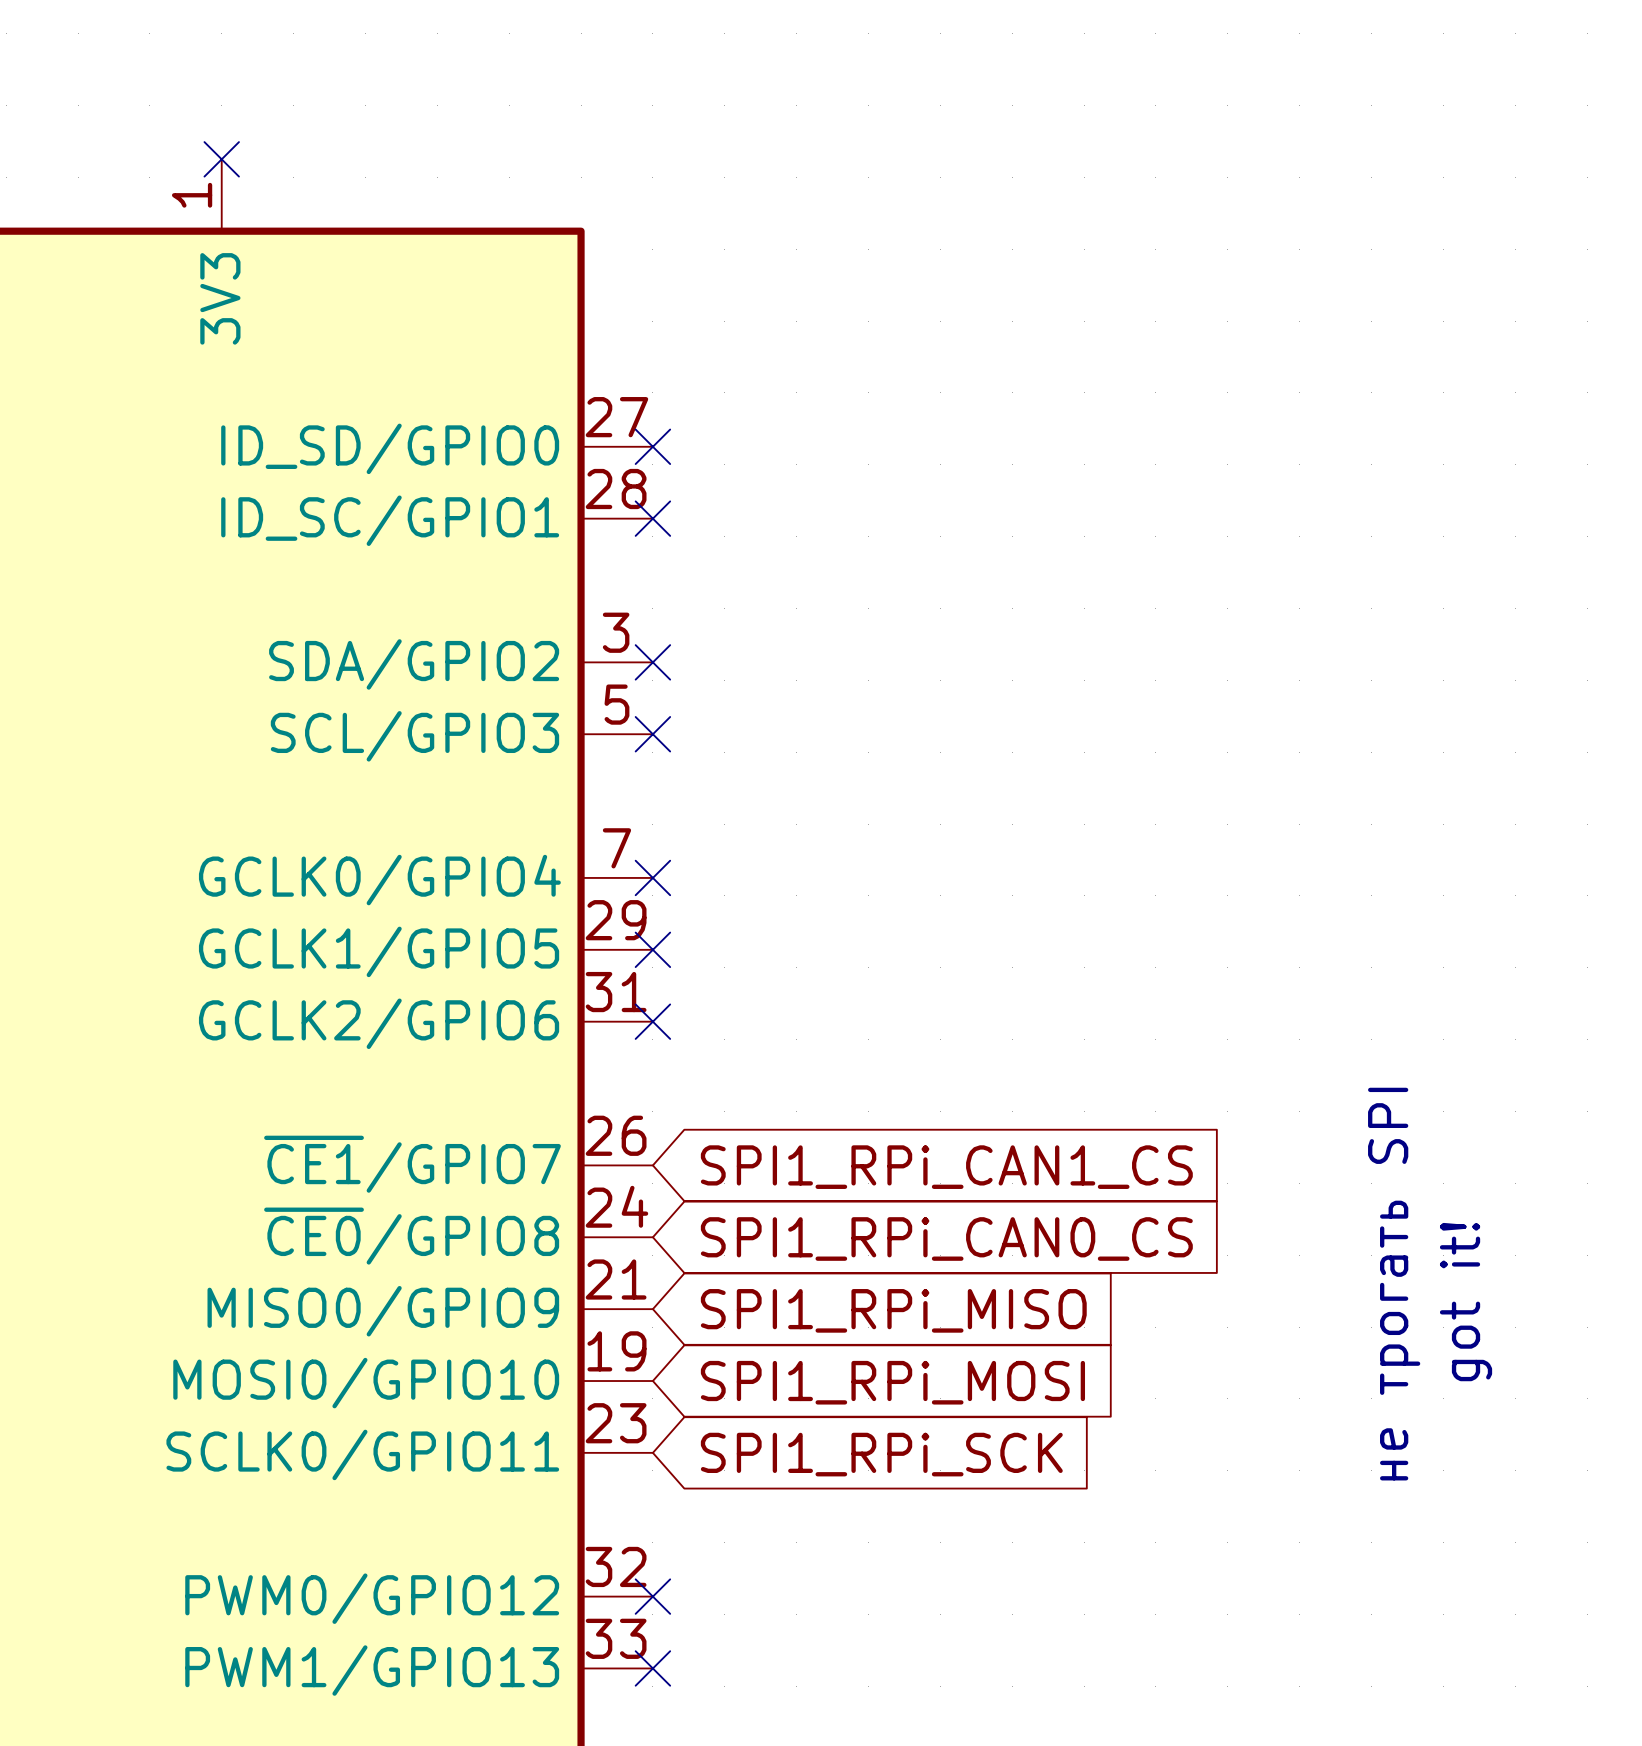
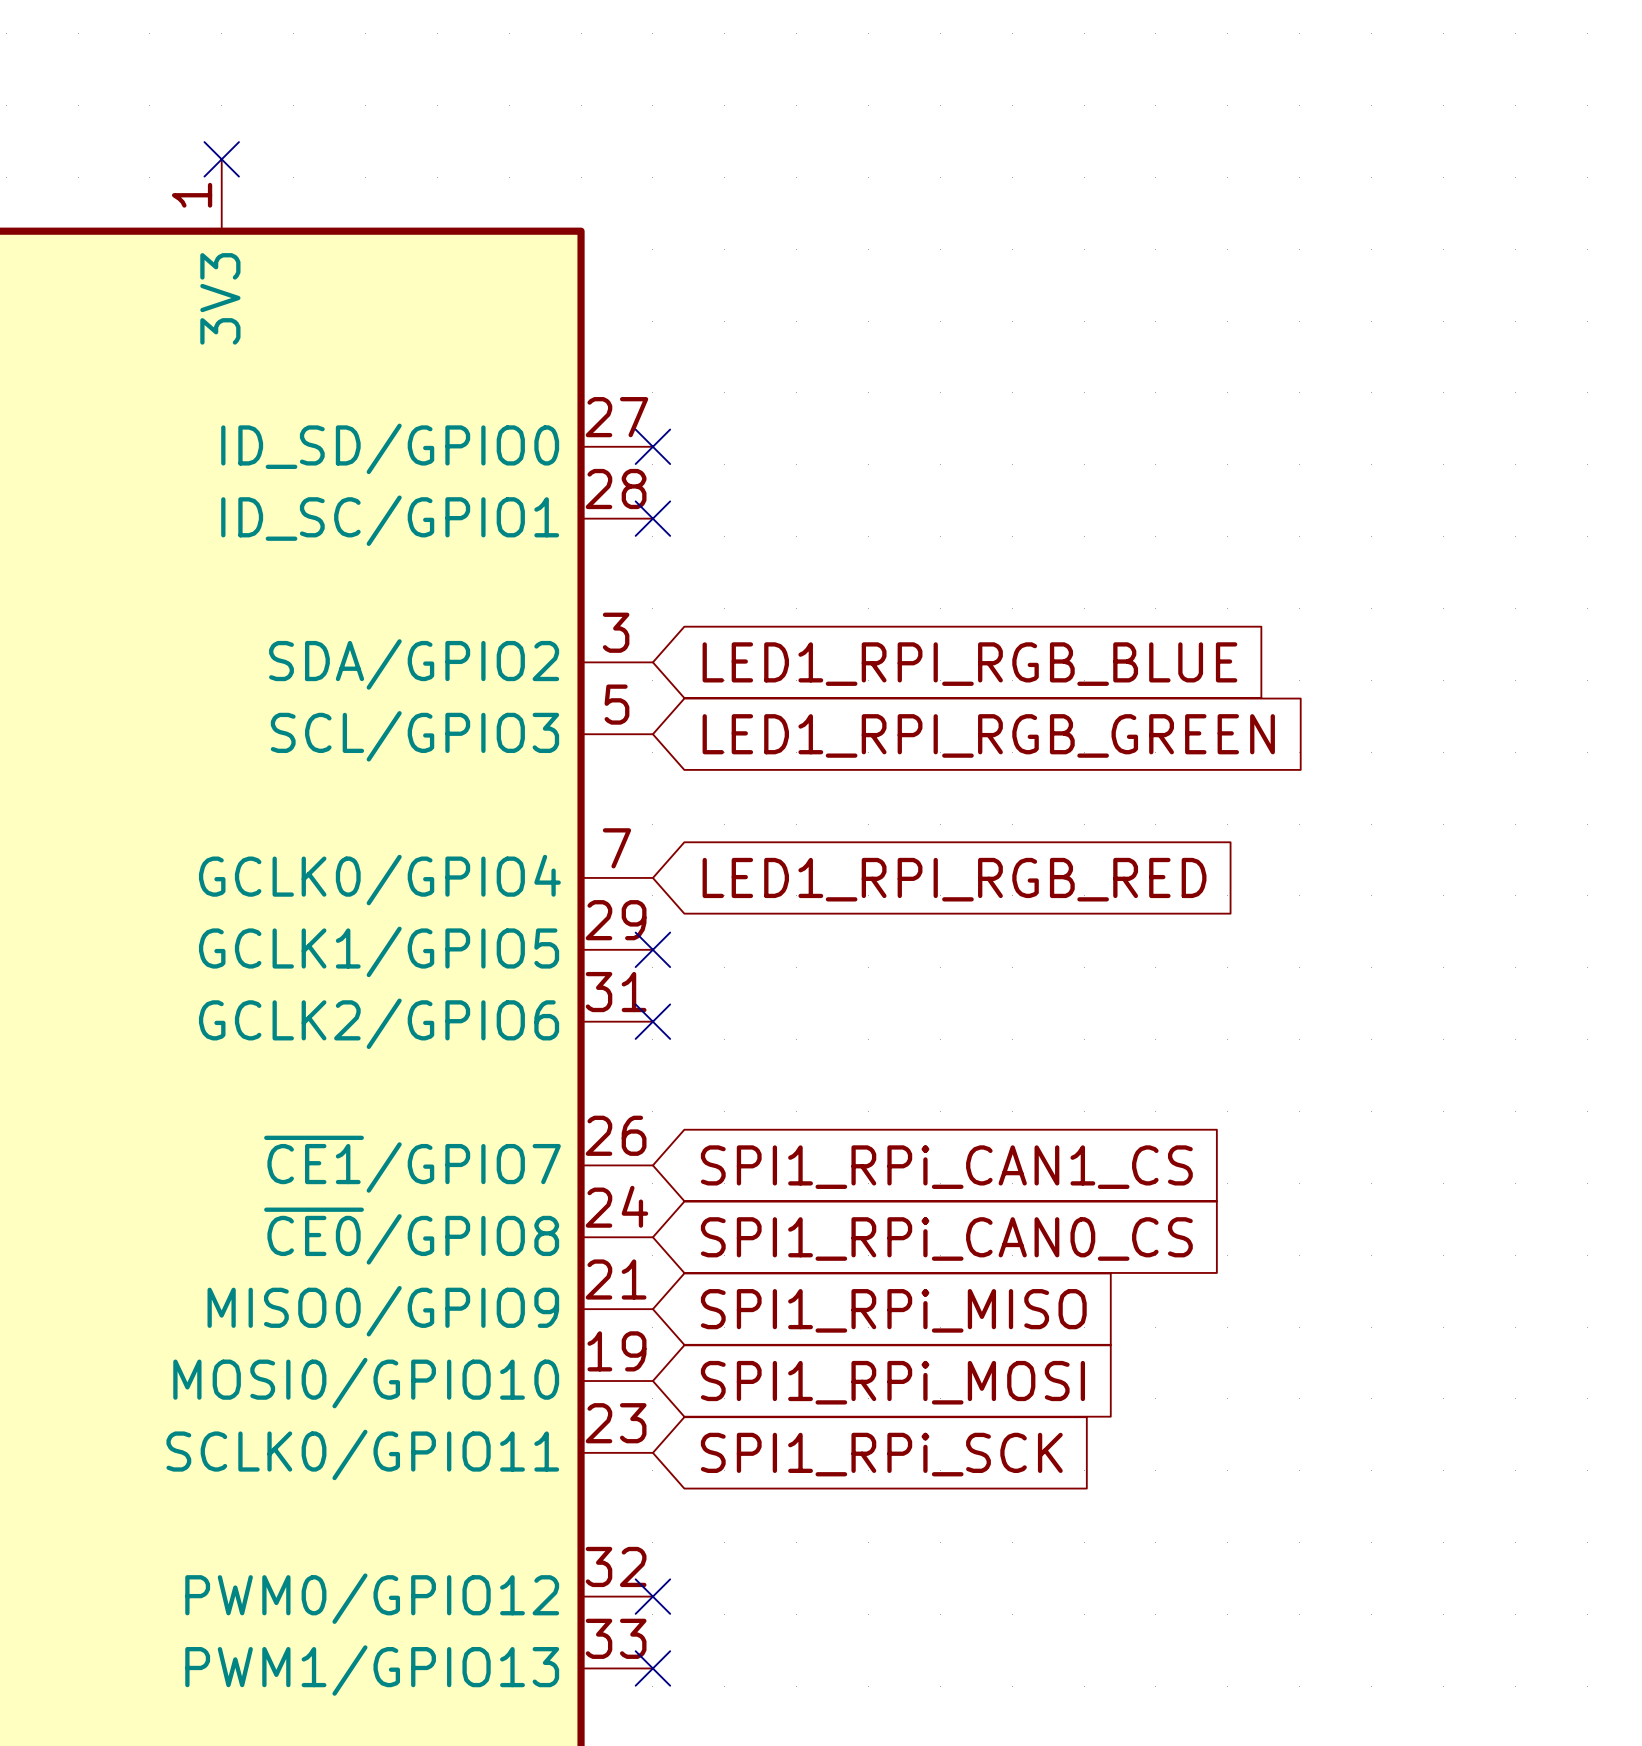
no-connect mark: (652, 662) -> none
global label: none -> LED1_RPI_RGB_BLUE (969, 664)
no-connect mark: (652, 734) -> none
global label: none -> LED1_RPI_RGB_GREEN (988, 735)
no-connect mark: (652, 877) -> none
global label: none -> LED1_RPI_RGB_RED (954, 879)
text: не трогать SPI (1394, 1284) -> none
text: got it! (1466, 1302) -> none

